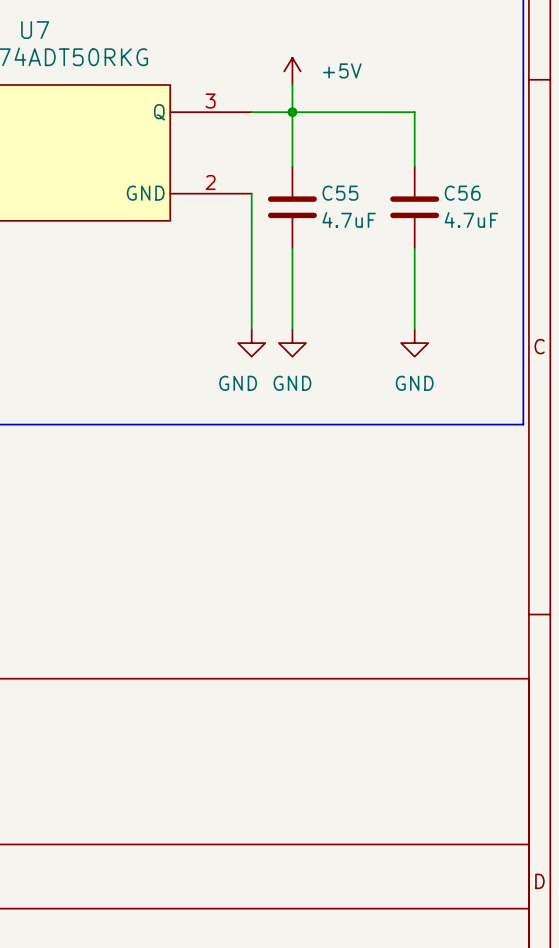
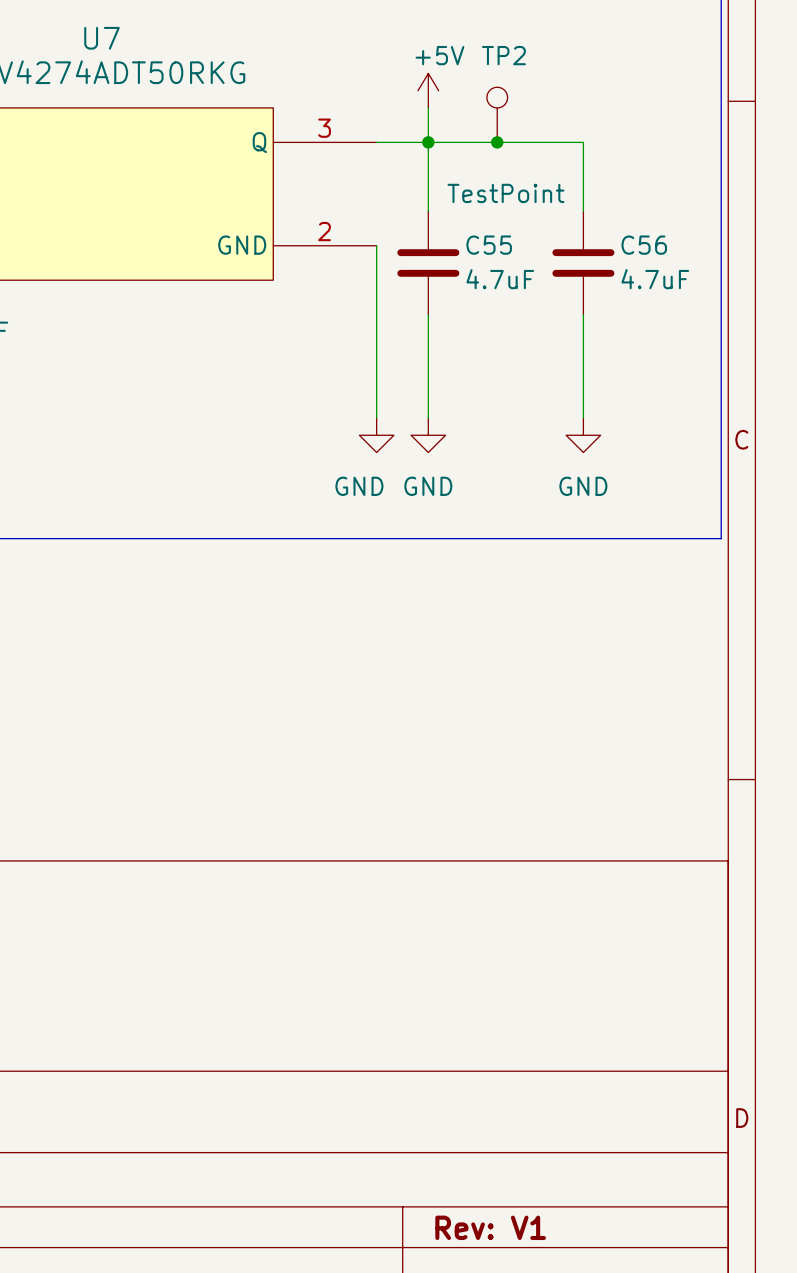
power symbol text position: +5V (342, 70) -> +5V (439, 55)
TP2: none -> TestPoint (497, 114)
junction: none -> (497, 142)

